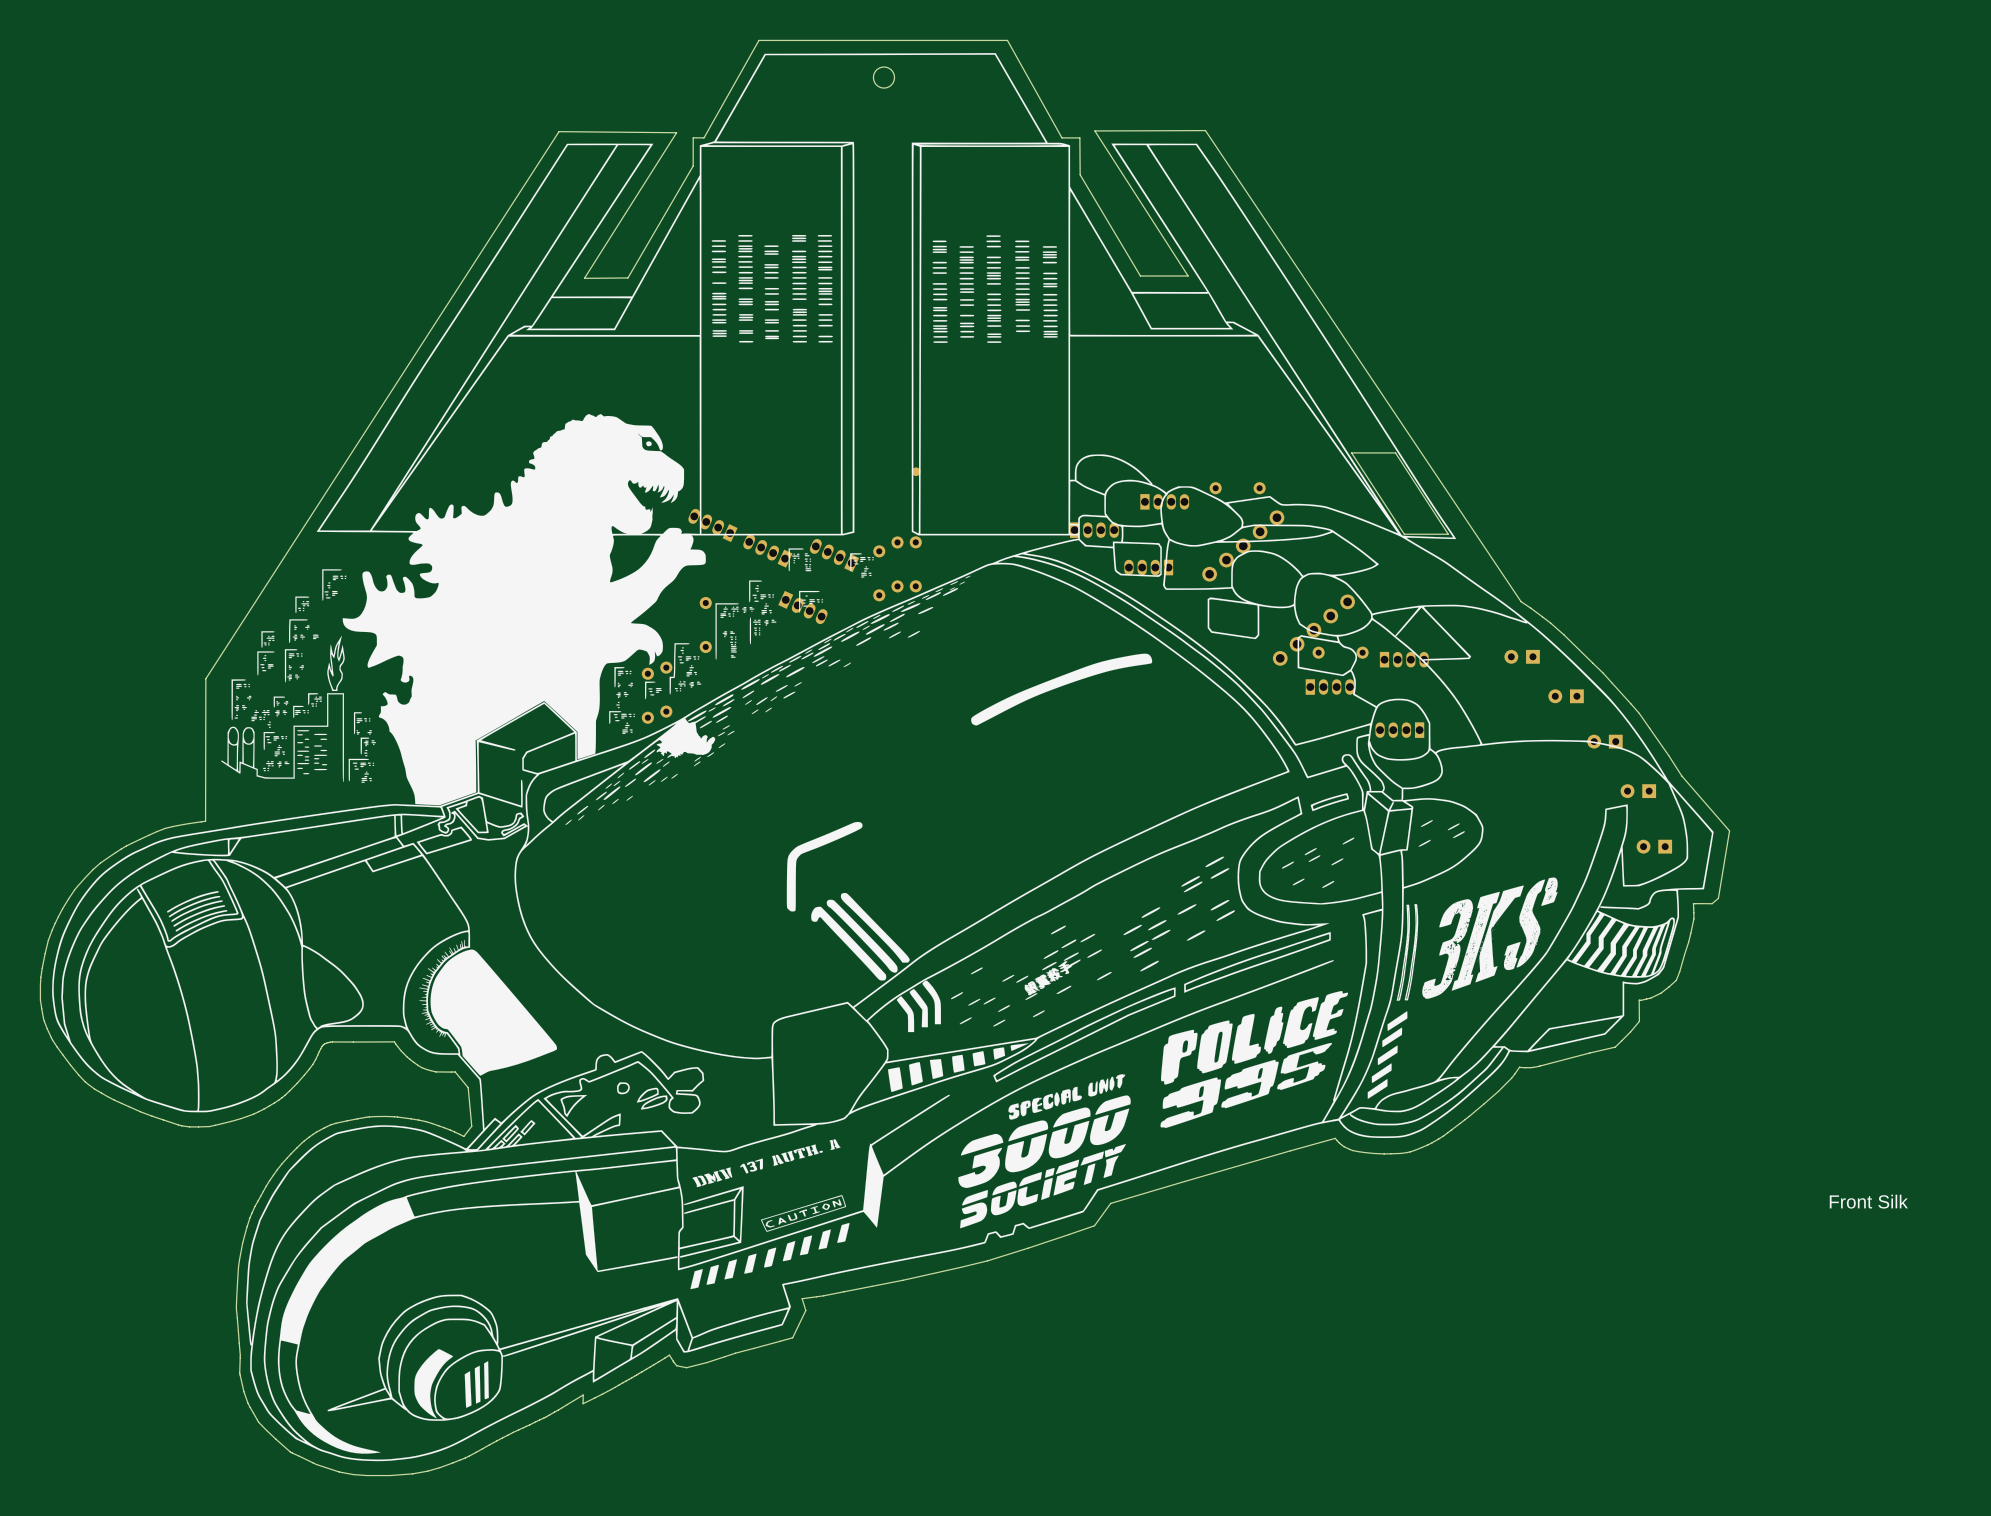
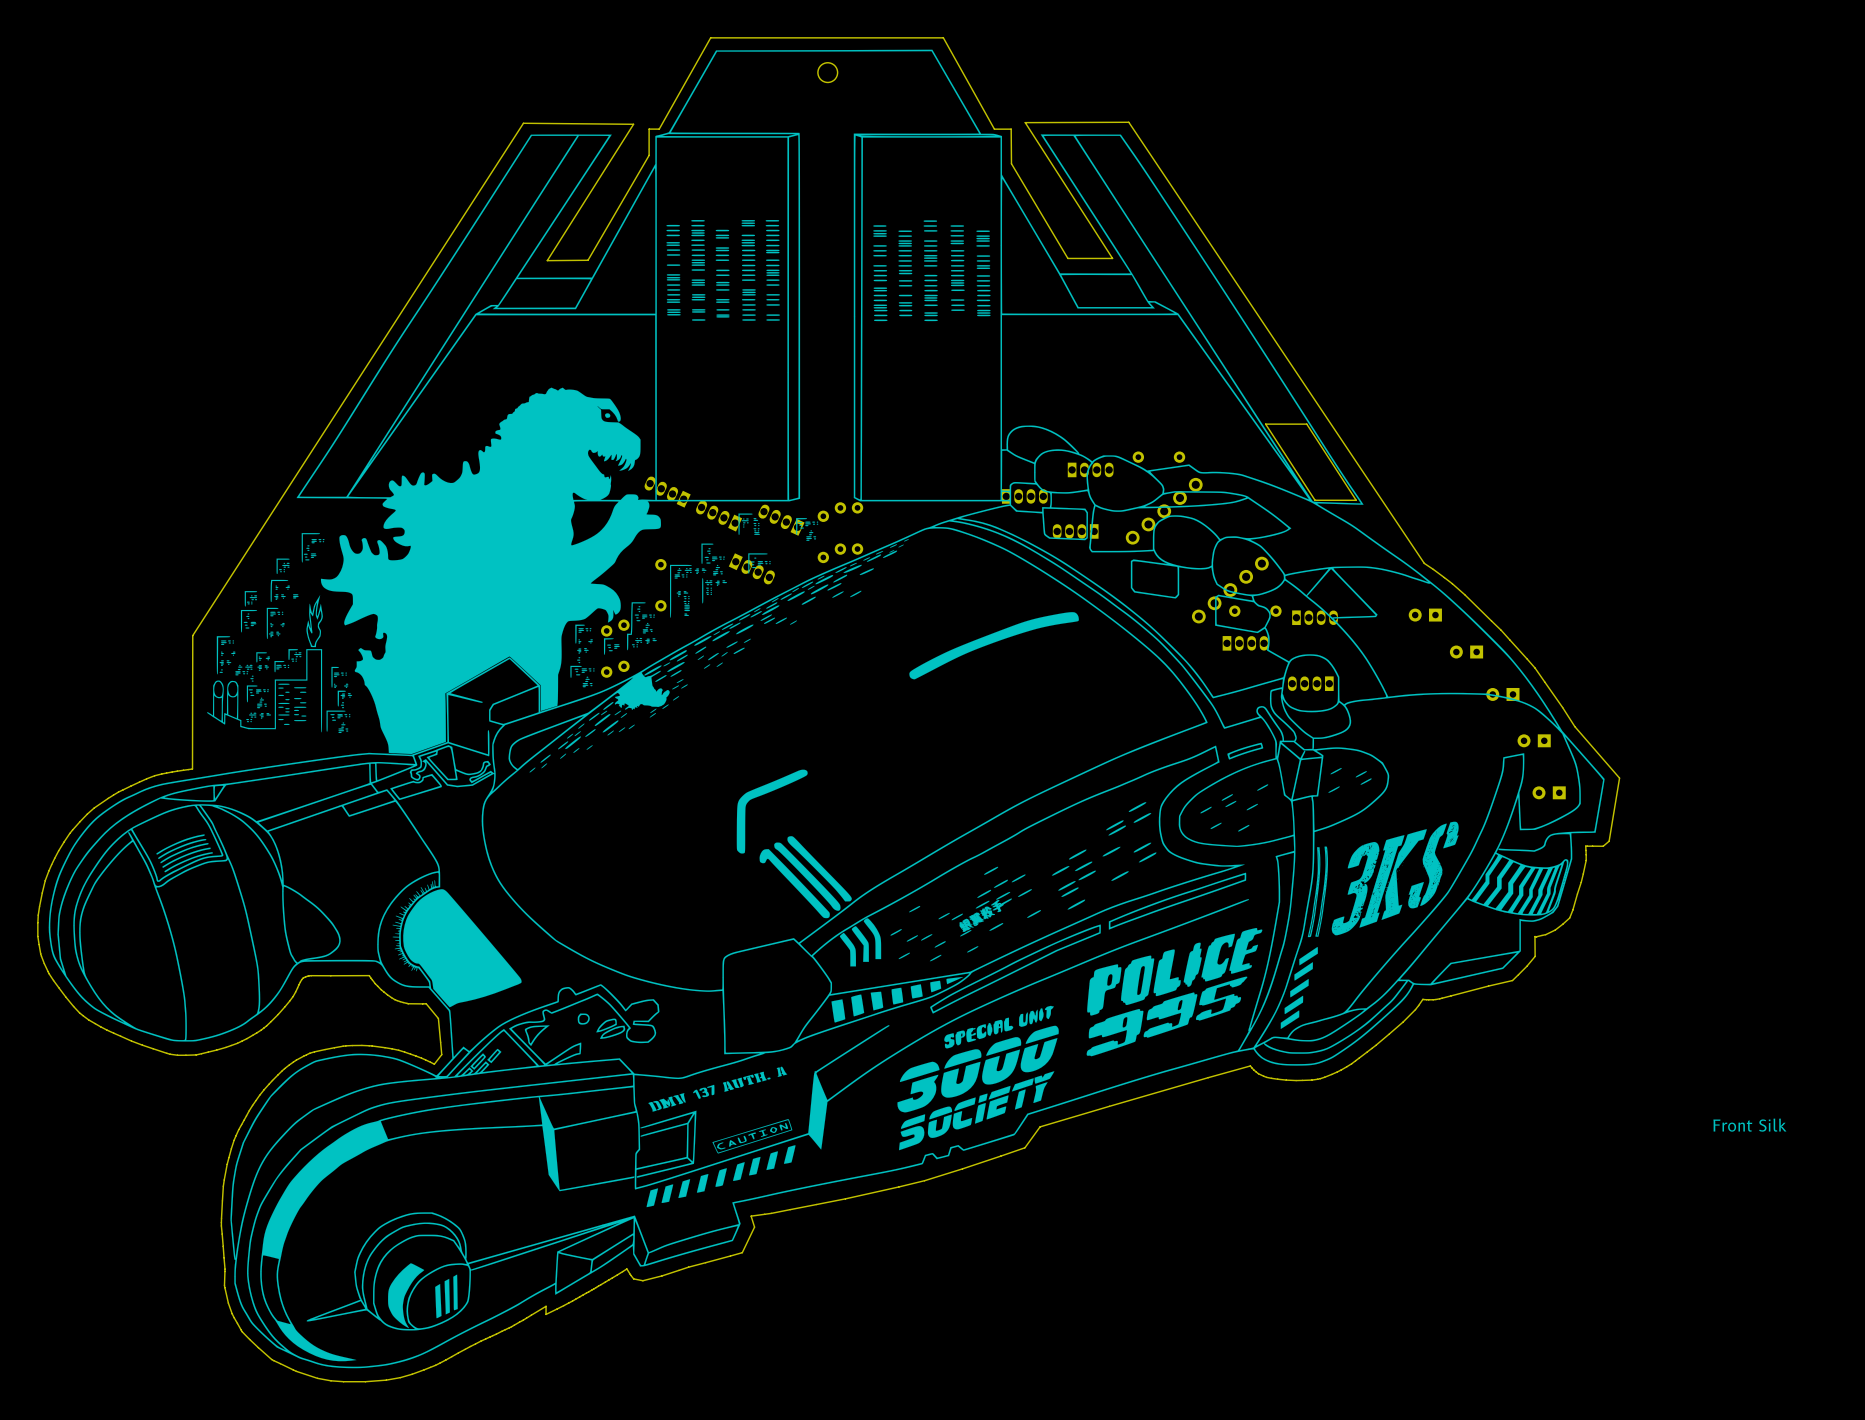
part: (916, 471) -> none

